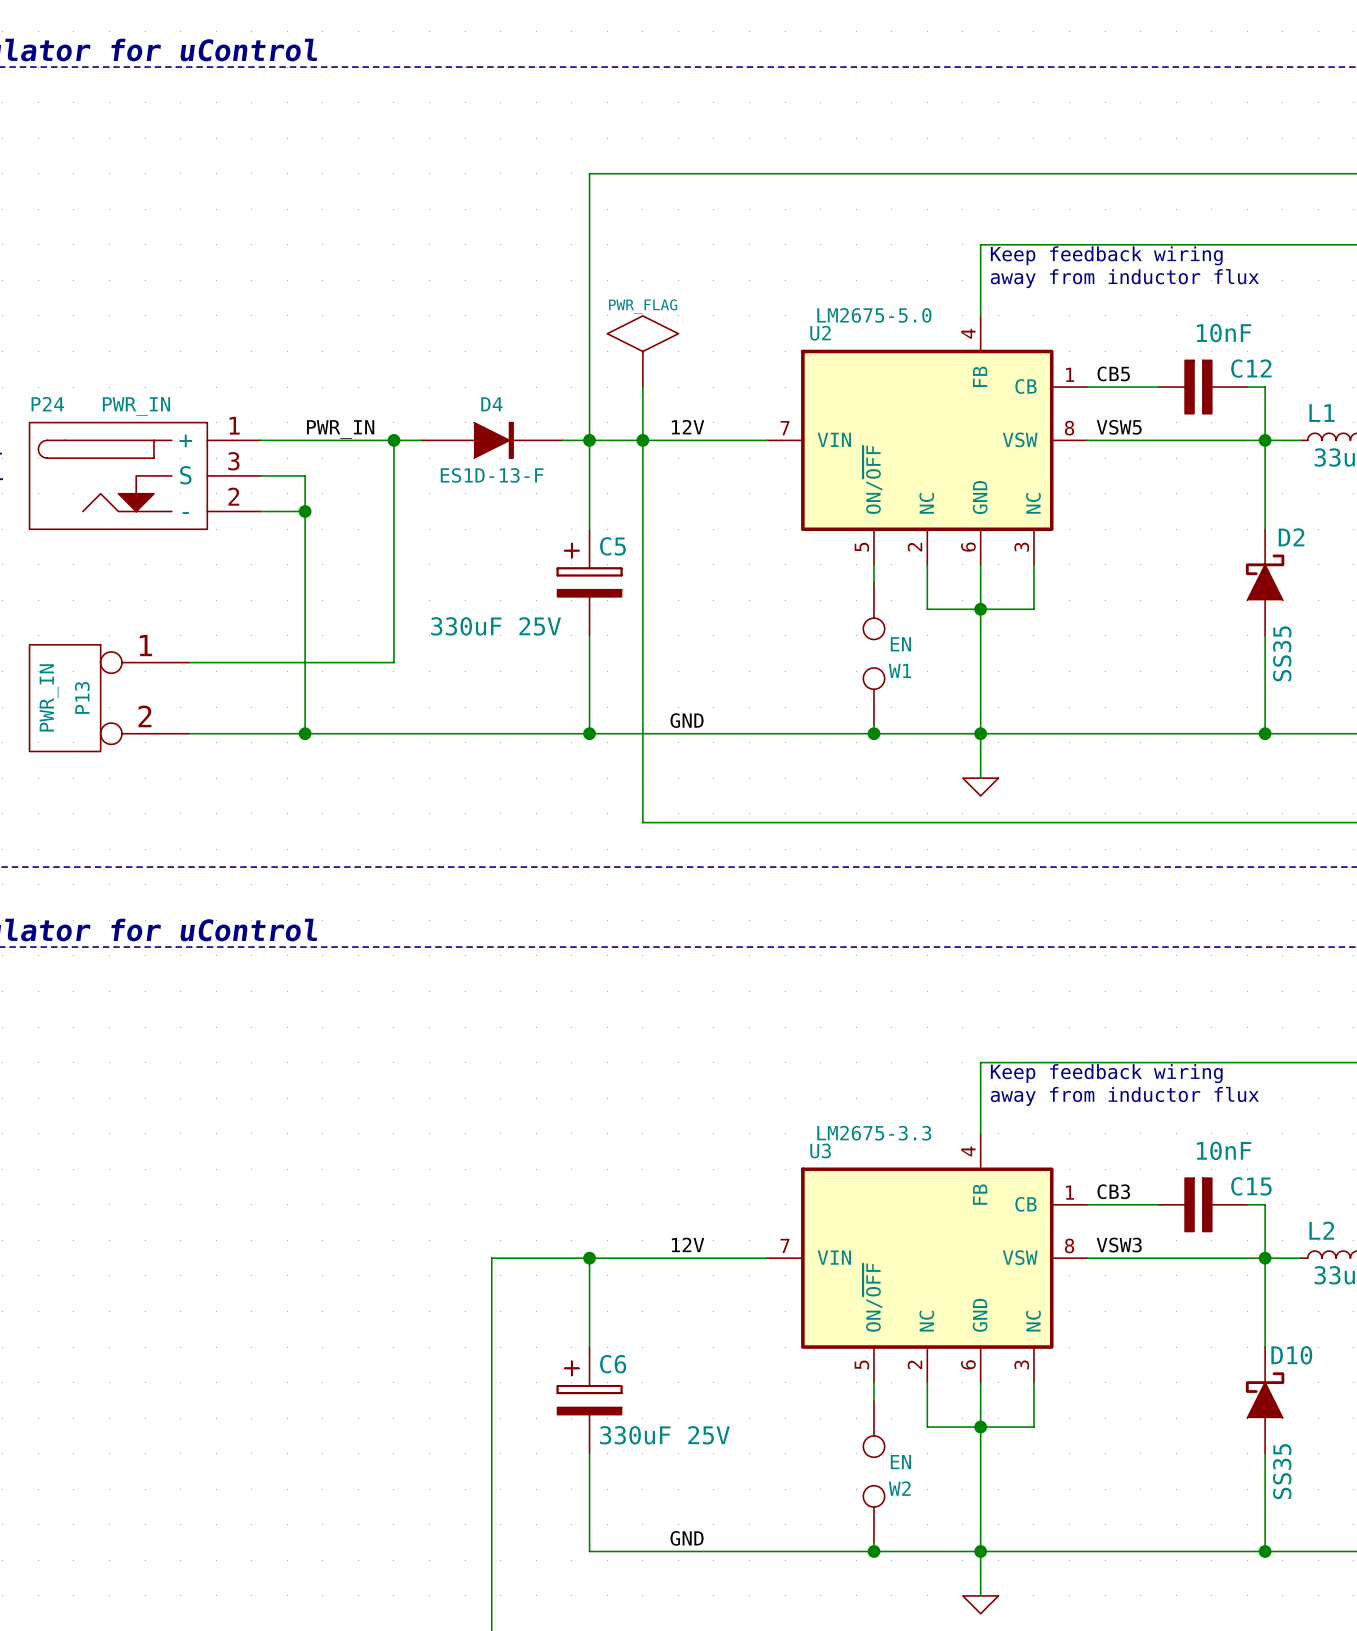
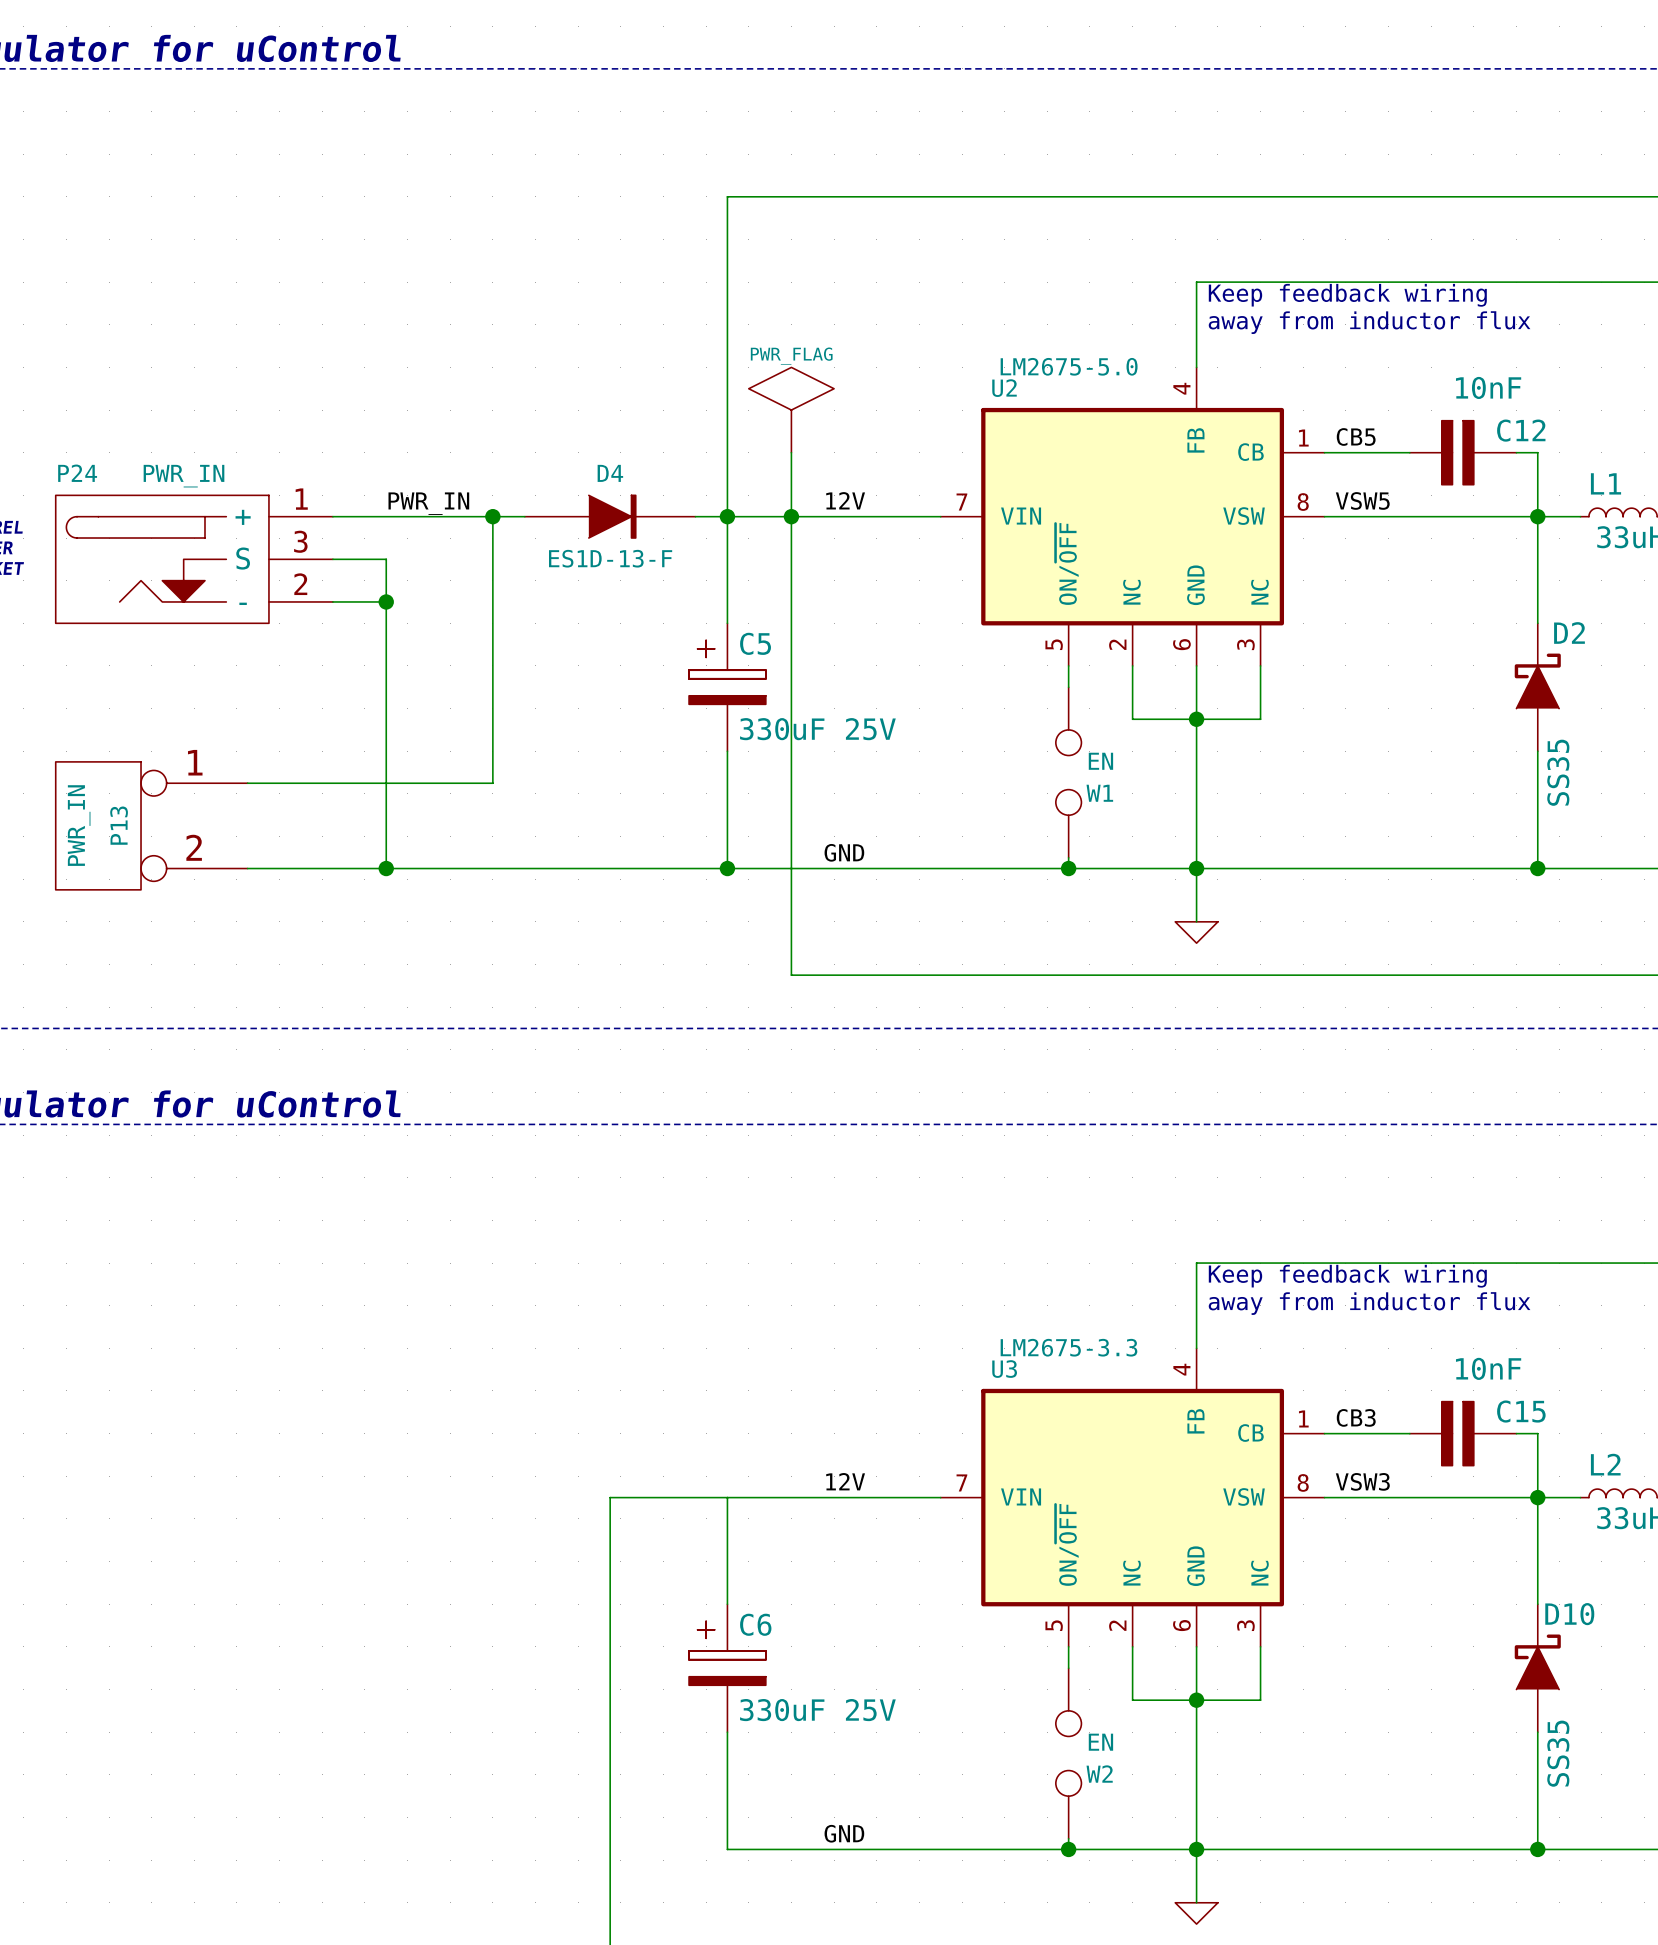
C5 value position: 330uF 25V (496, 626) -> 330uF 25V (817, 729)
junction: (589, 1258) -> none

